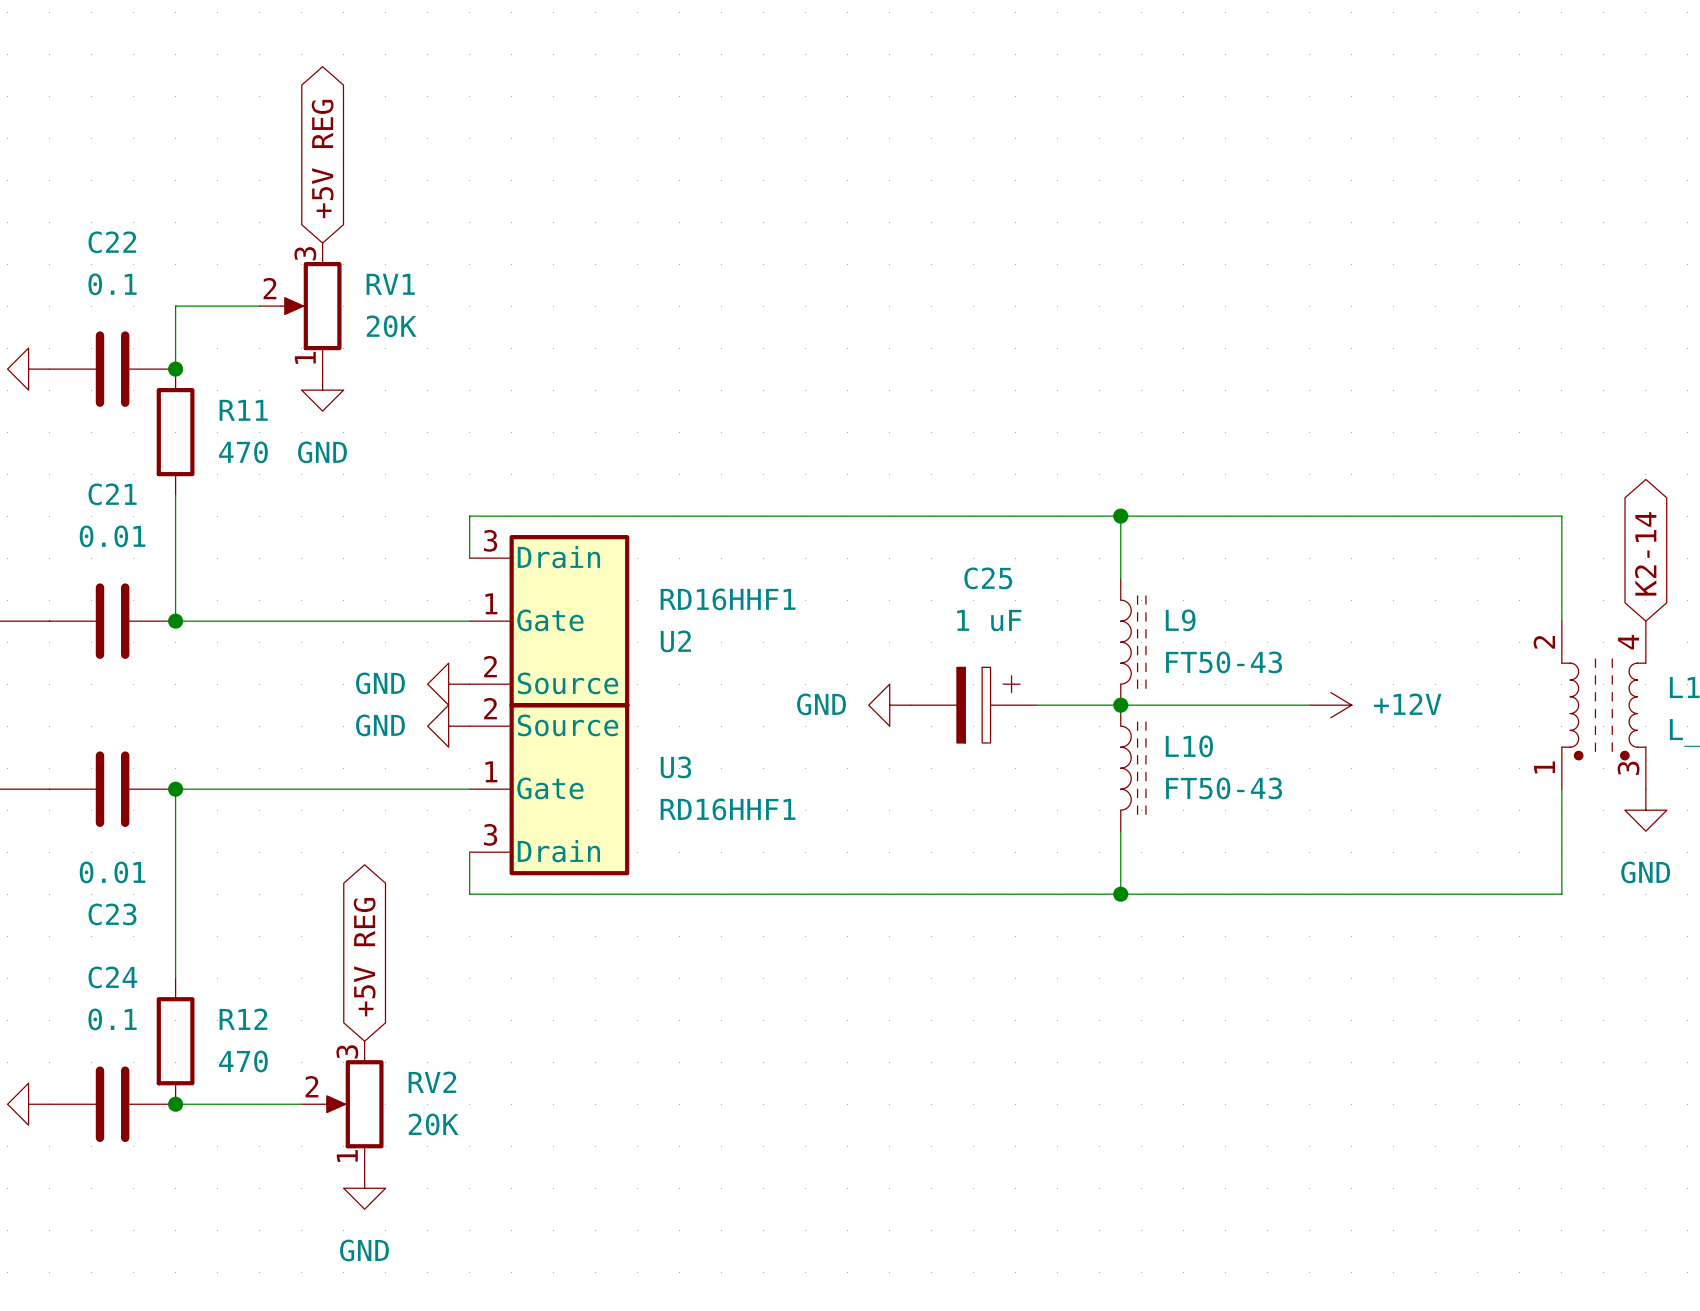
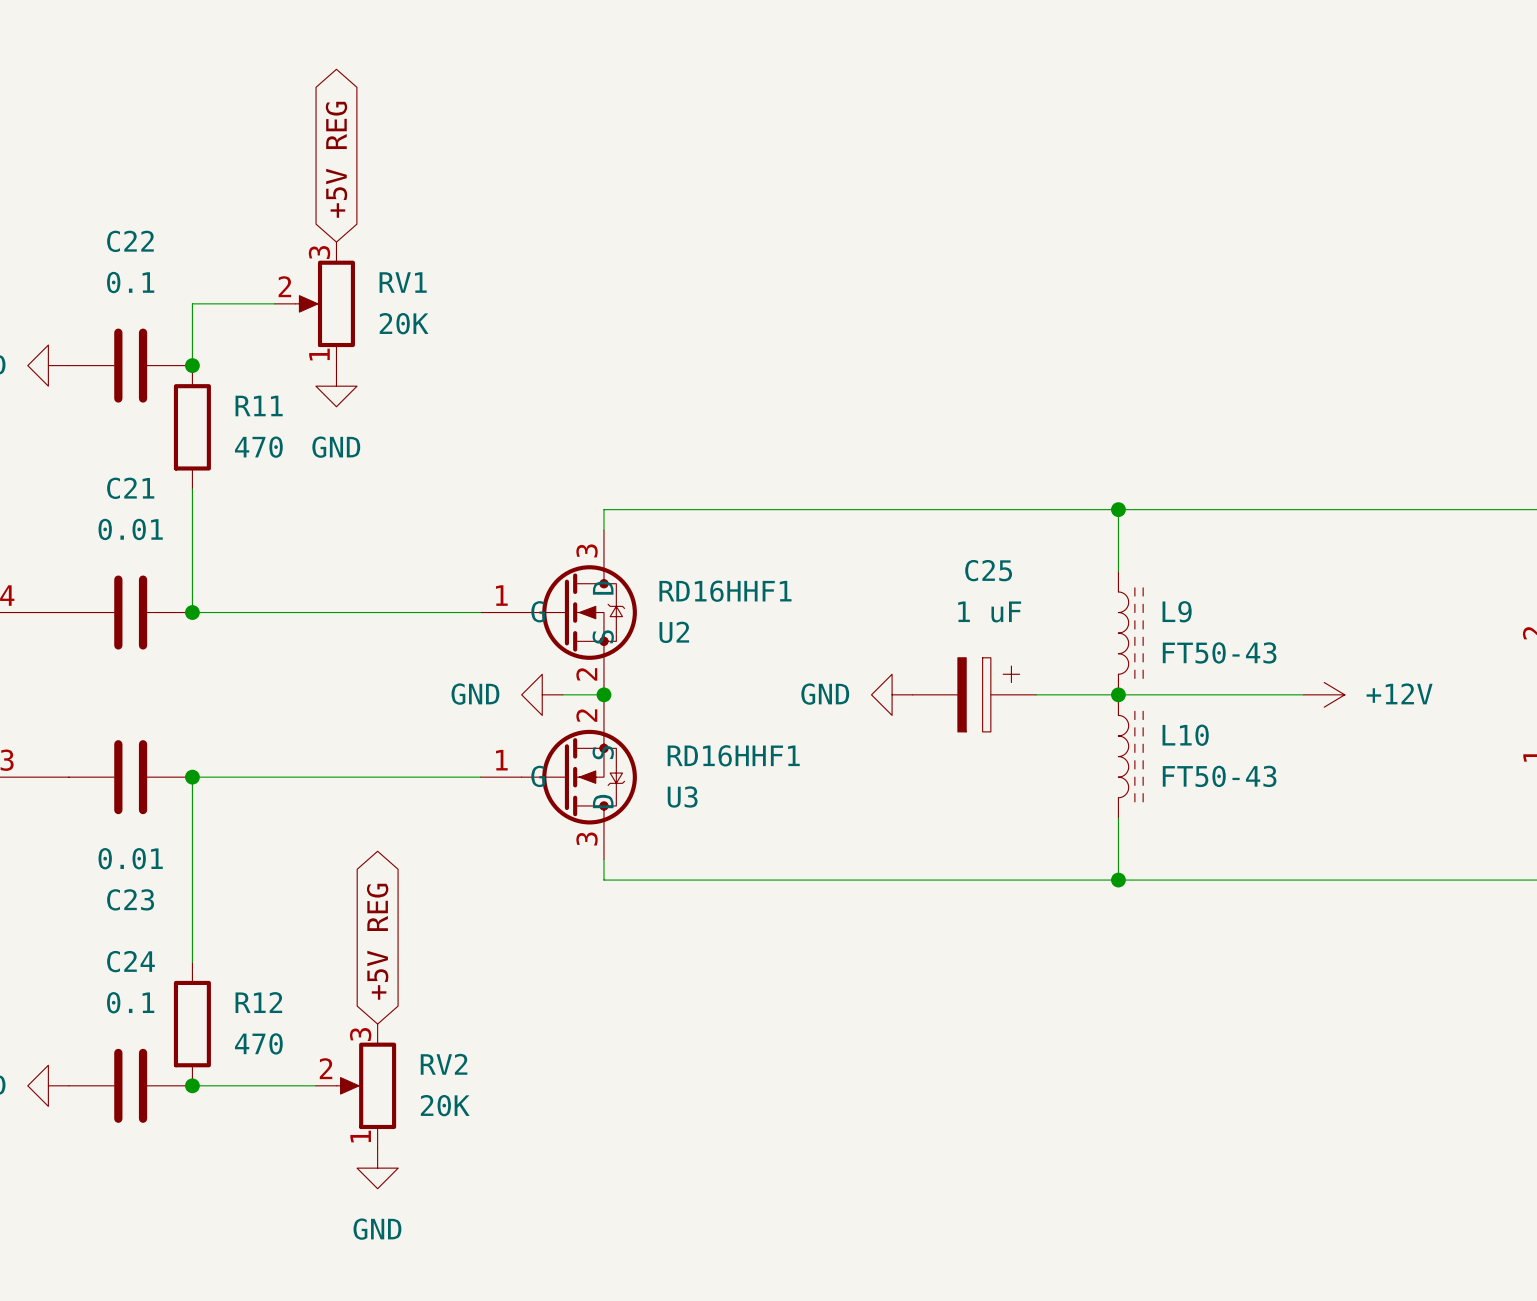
wire: (595, 516) (469, 516) (469, 558) -> (603, 509) (603, 530)
U2 symbol: [469, 535, 630, 708] -> [480, 530, 637, 695]
power symbol: GND (448, 684) -> none
U3 symbol: [469, 703, 630, 876] -> [480, 694, 637, 860]
power symbol: none -> GND (542, 694)
junction: none -> (603, 694)
power symbol: GND (448, 726) -> none
U3 name position: U3 (675, 767) -> U3 (682, 796)
U3 value position: RD16HHF1 (728, 809) -> RD16HHF1 (733, 755)
wire: (469, 852) (469, 894) (595, 894) -> (603, 859) (603, 880)

